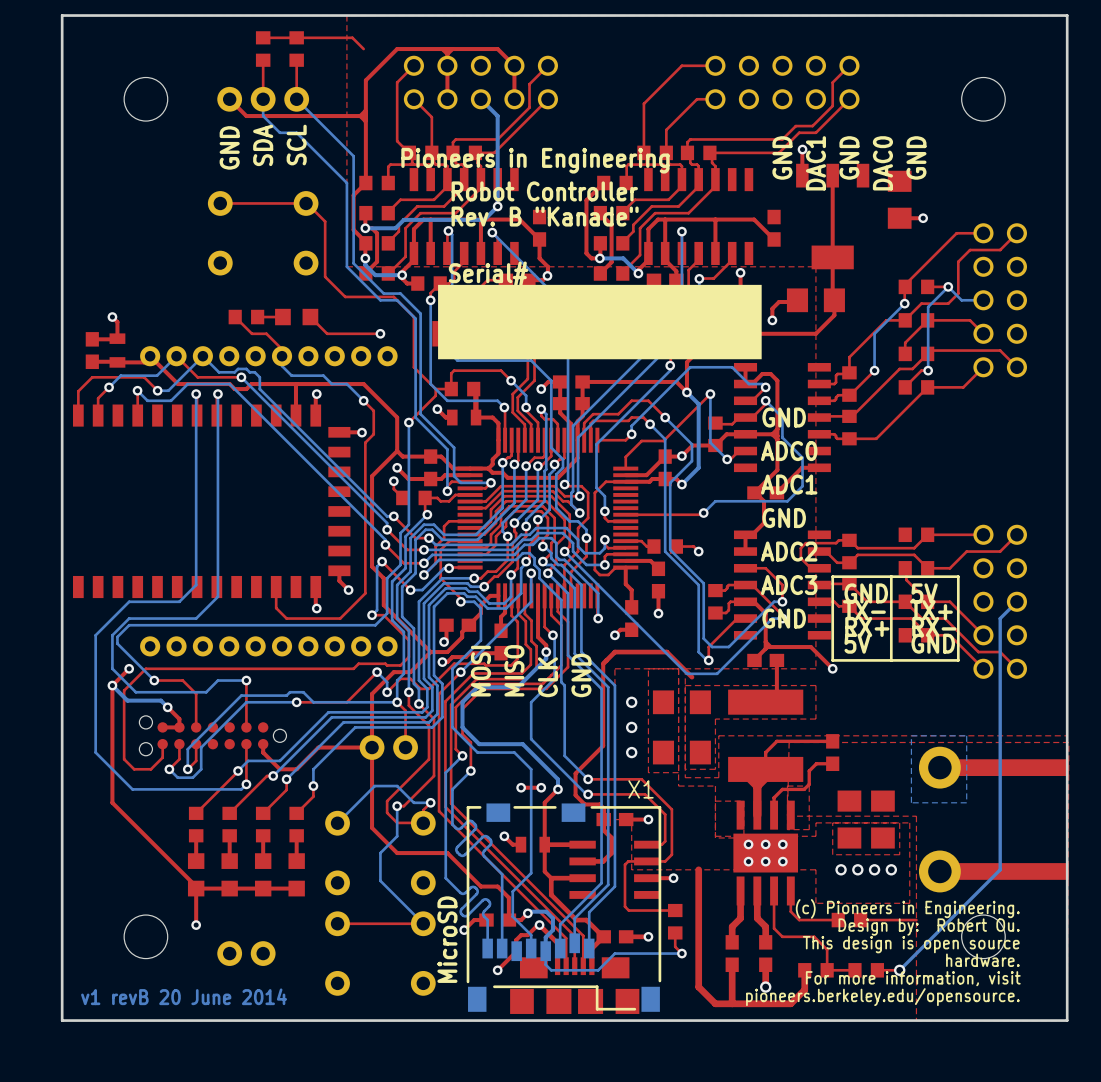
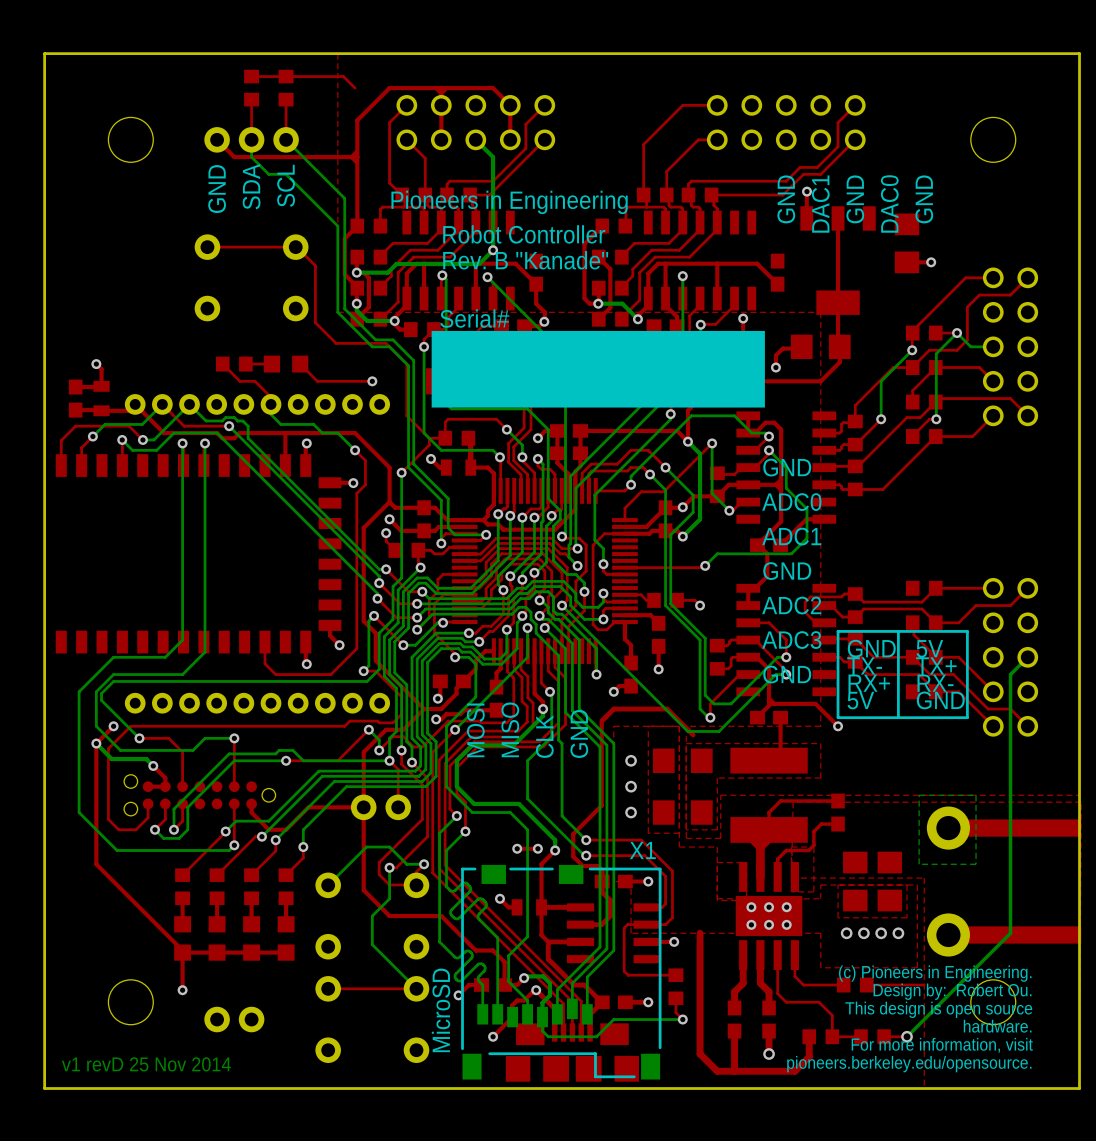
text: v1 revB 20 June 2014 (184, 996) -> v1 revD 25 Nov 2014 (146, 1064)

